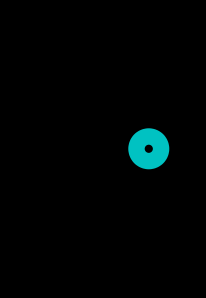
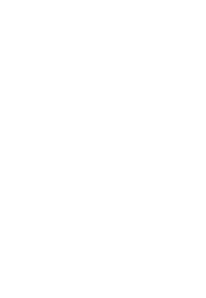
part: (148, 148) -> none

